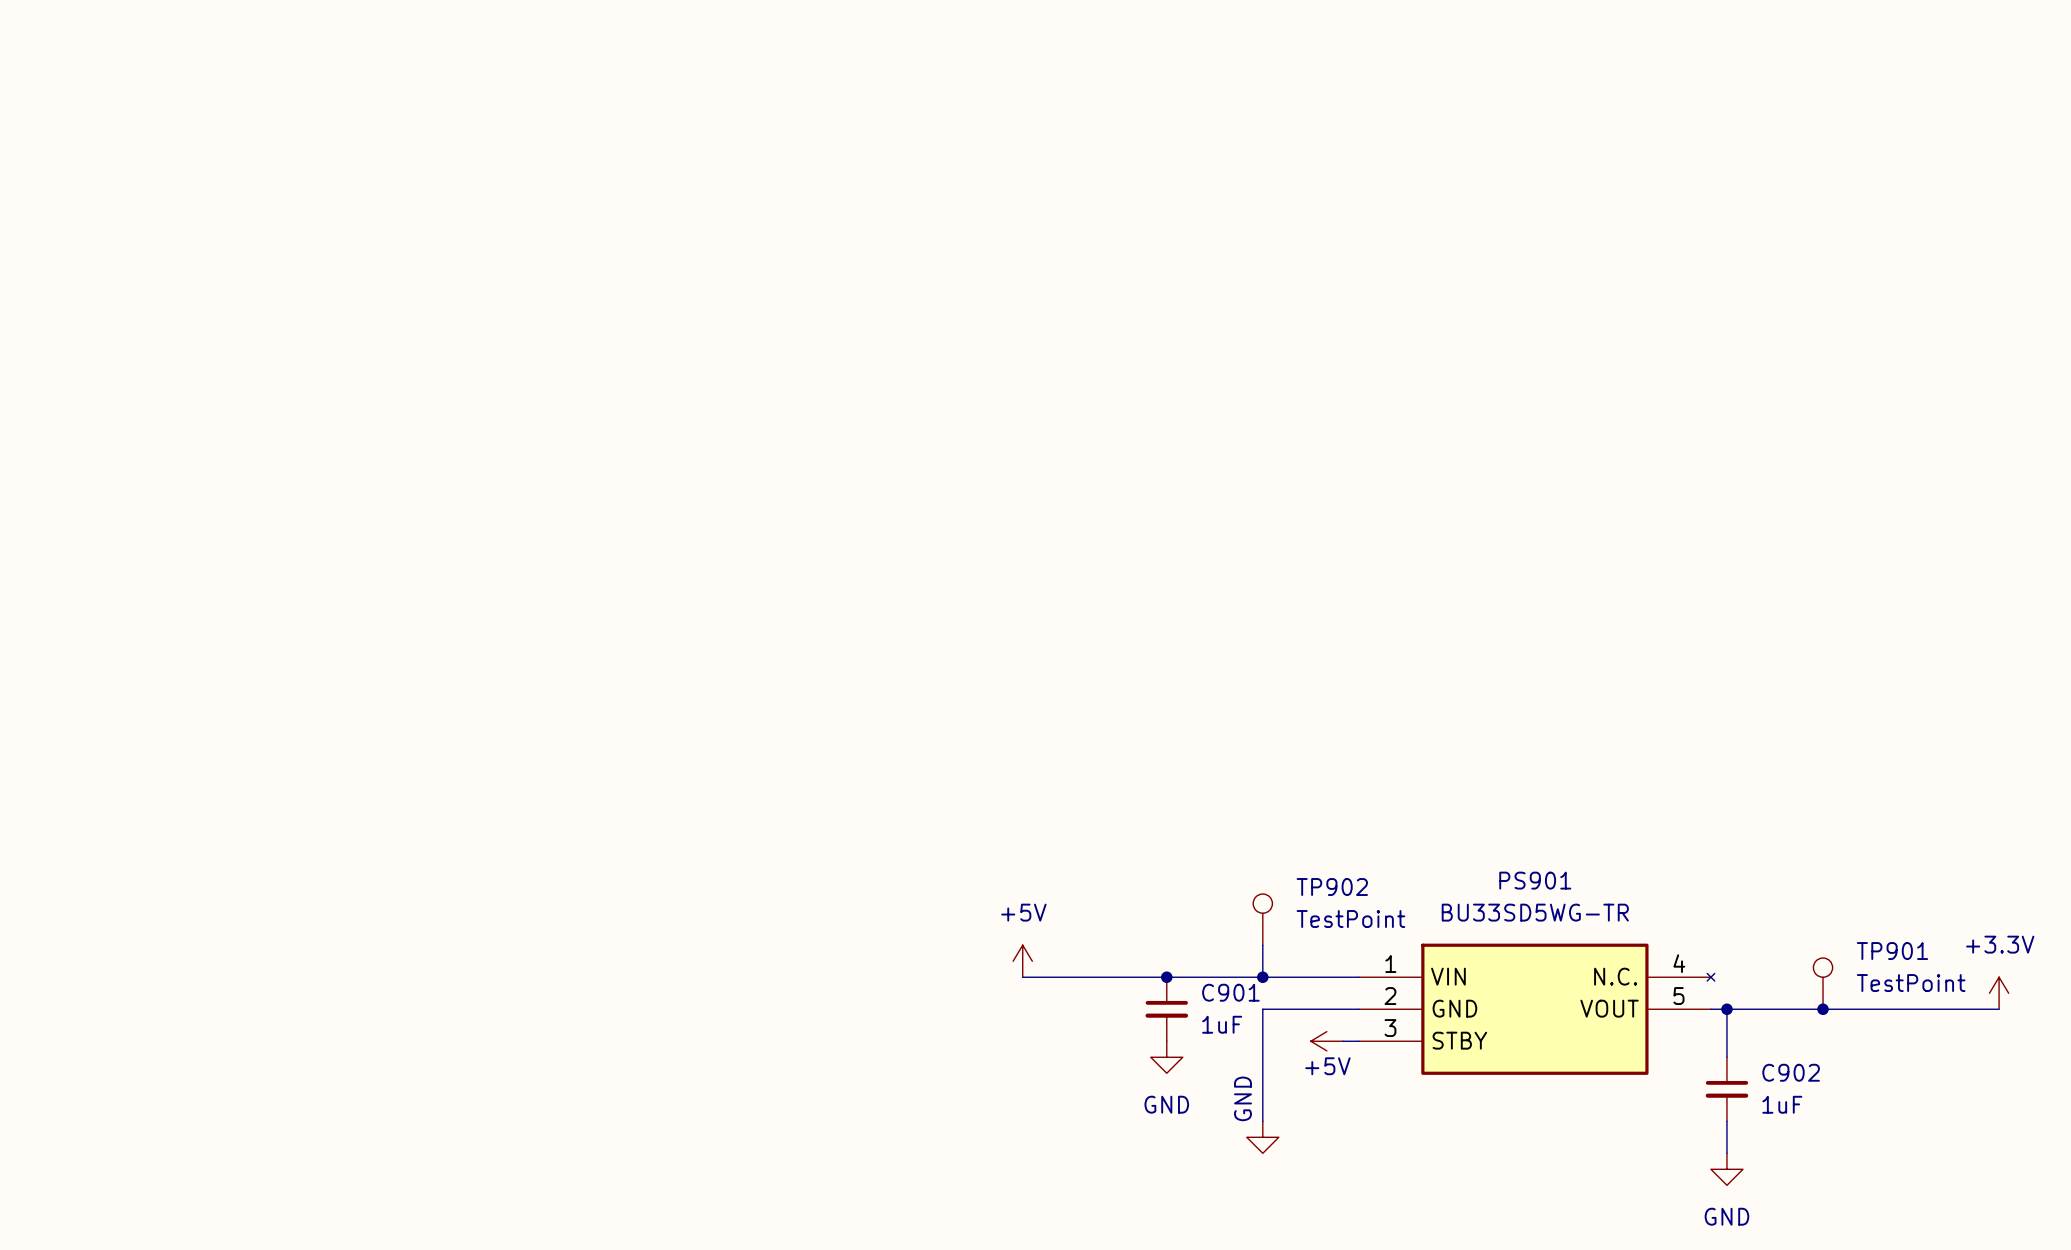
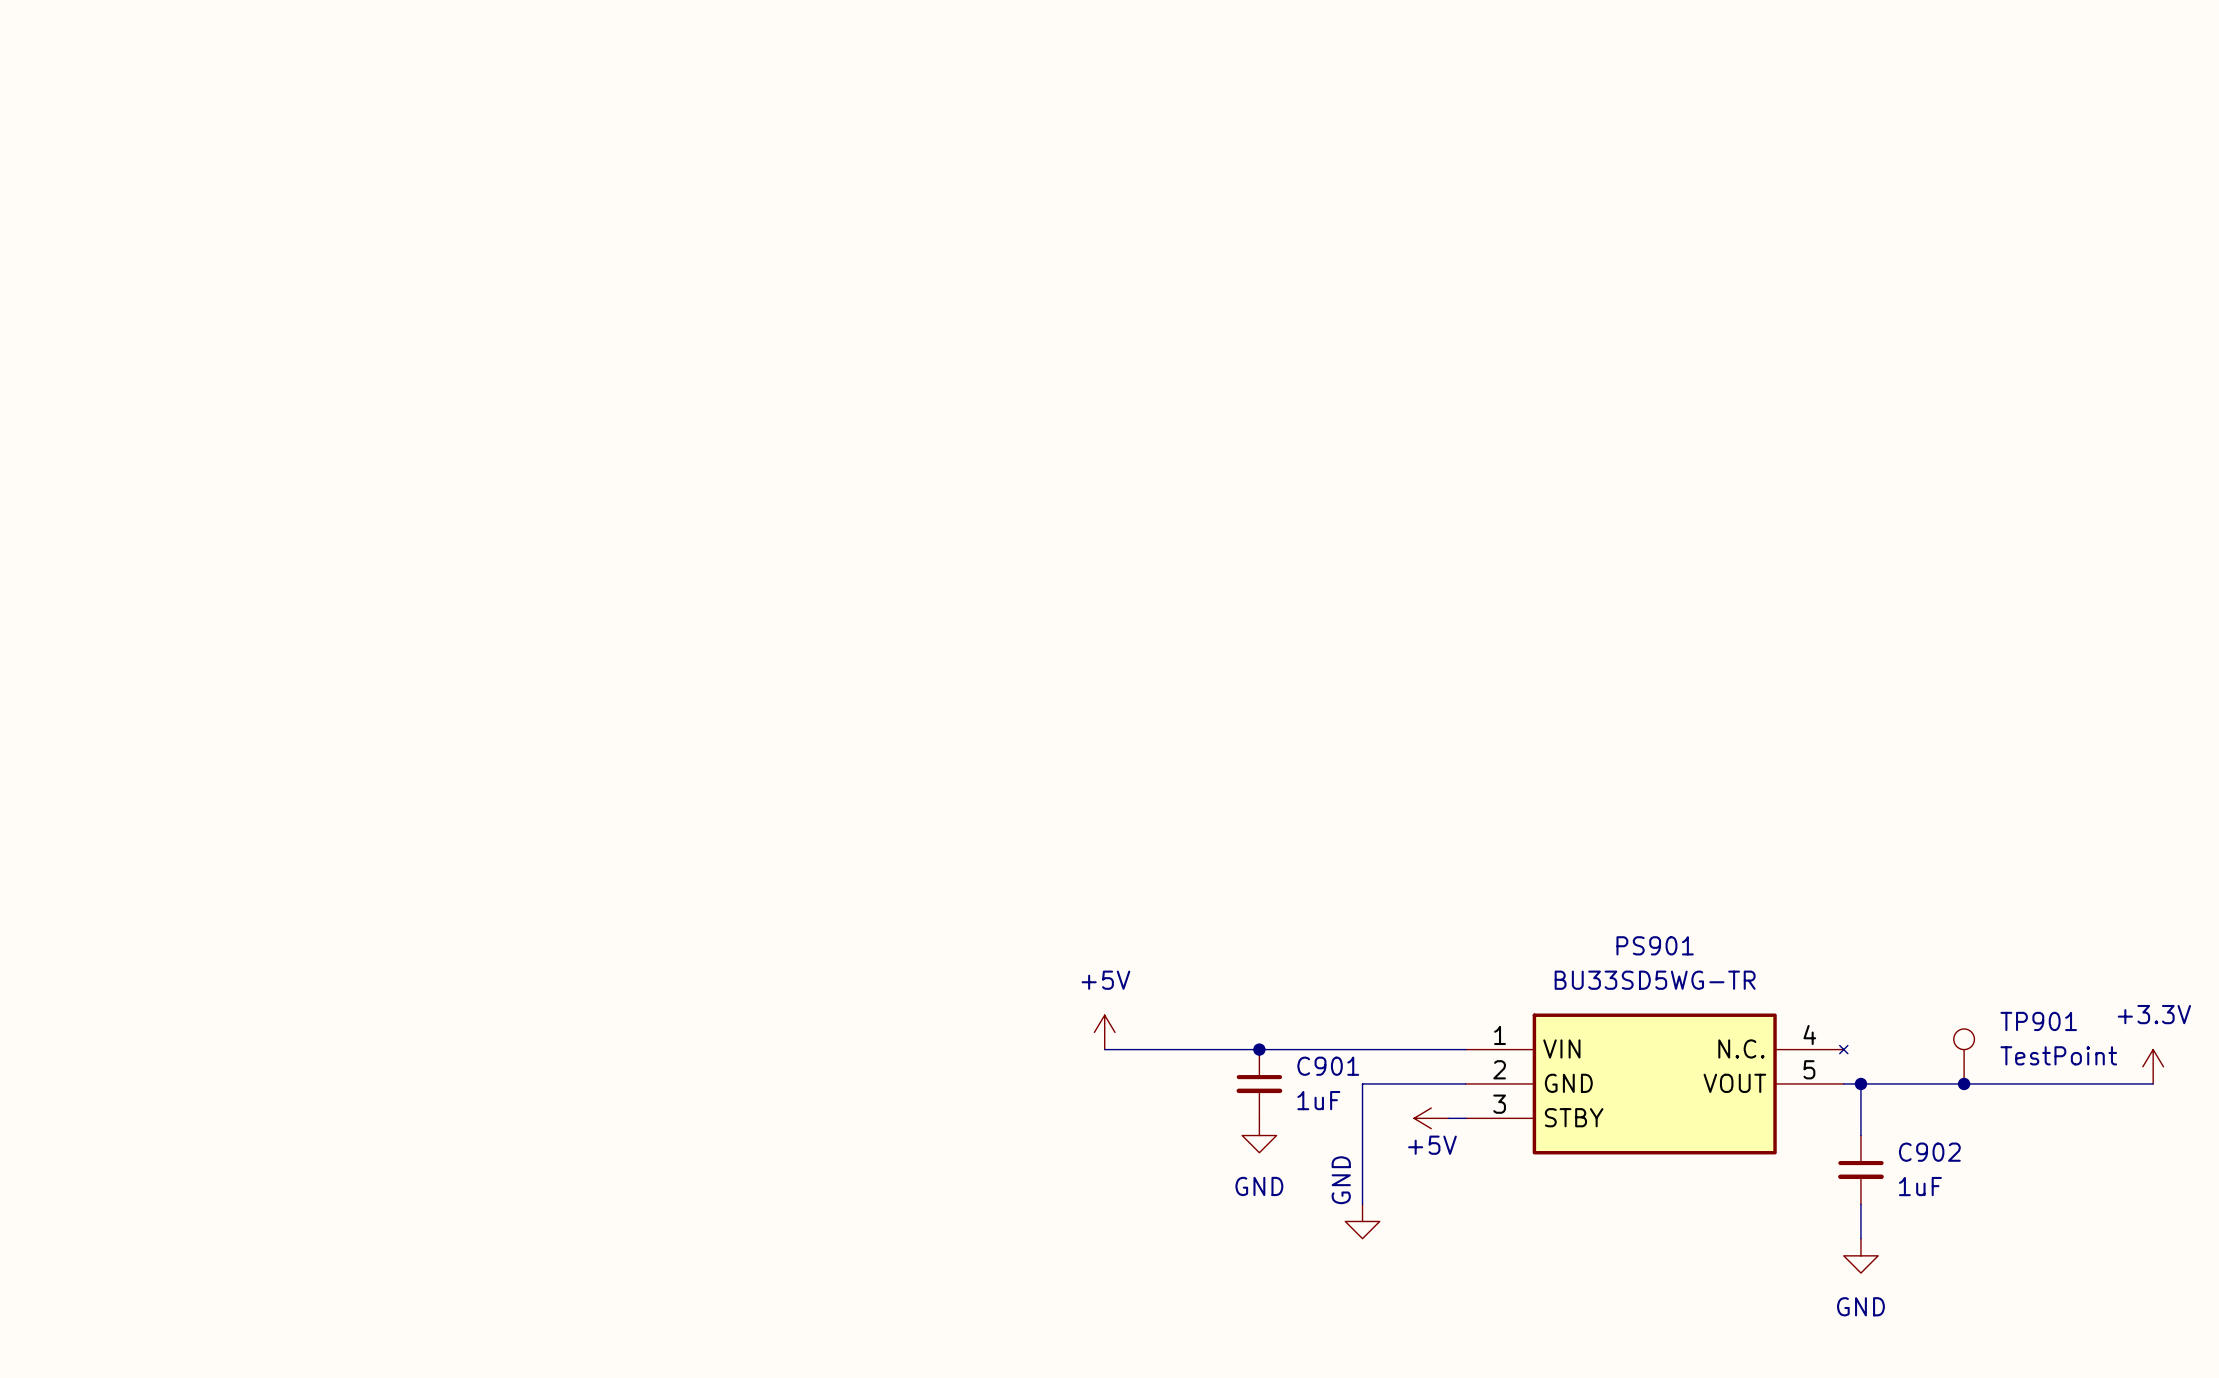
TP902: TestPoint (1262, 919) -> none
wire: (1262, 945) (1262, 977) -> none
junction: (1262, 977) -> none

